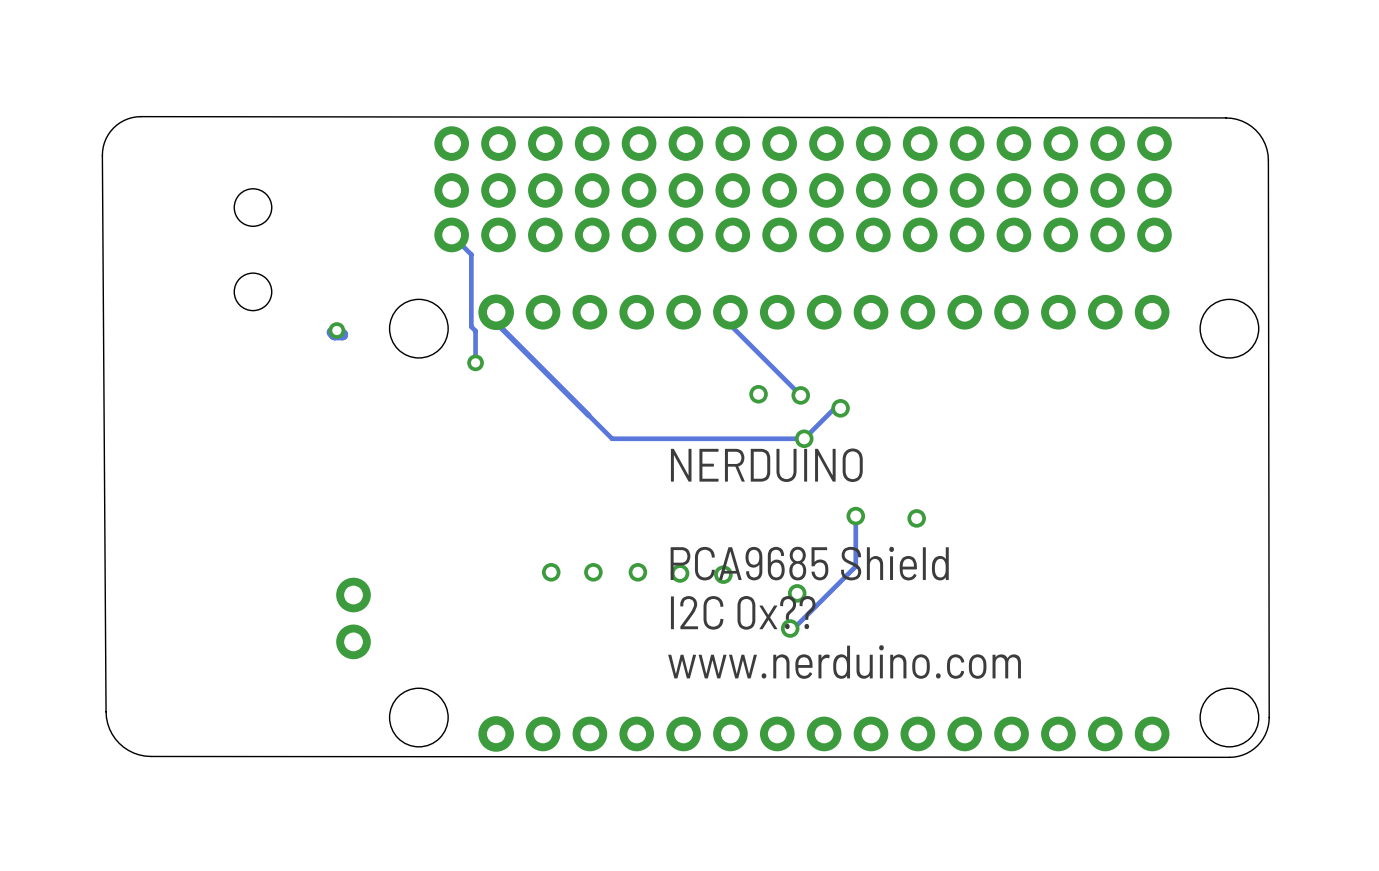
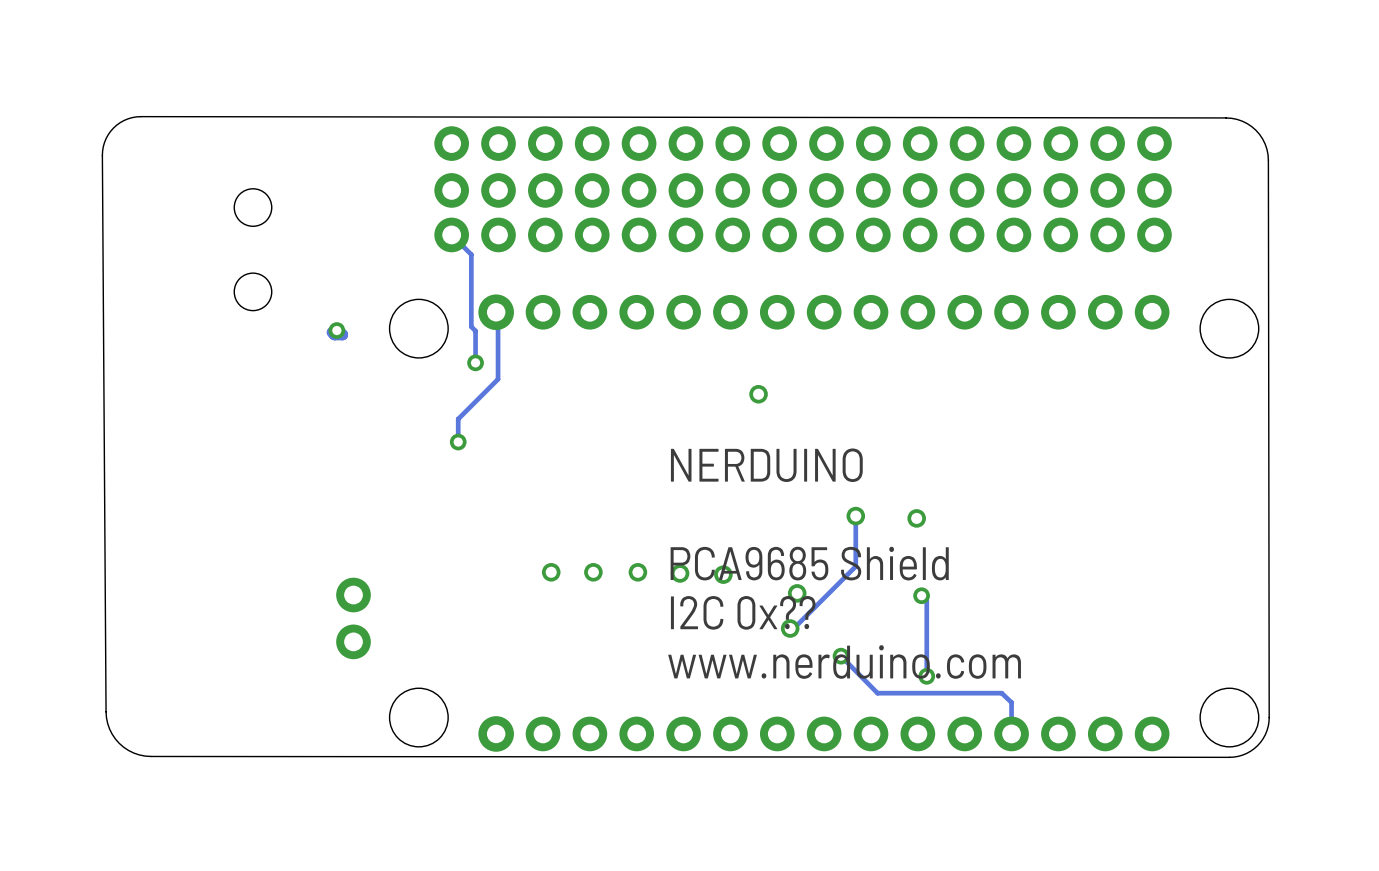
track: (496, 312) (496, 322) (612, 438) (804, 438) (834, 408) (840, 408) -> (496, 312) (498, 314) (498, 379) (458, 419) (458, 442)
track: (730, 312) (730, 325) (800, 395) -> none
via: (800, 395) -> none
via: (840, 408) -> none
via: (804, 438) -> none
via: none -> (458, 442)
track: none -> (921, 595) (926, 600) (926, 676)
via: none -> (921, 595)
track: none -> (841, 656) (877, 693) (1001, 693) (1011, 702) (1011, 733)
via: none -> (841, 656)
via: none -> (926, 676)

